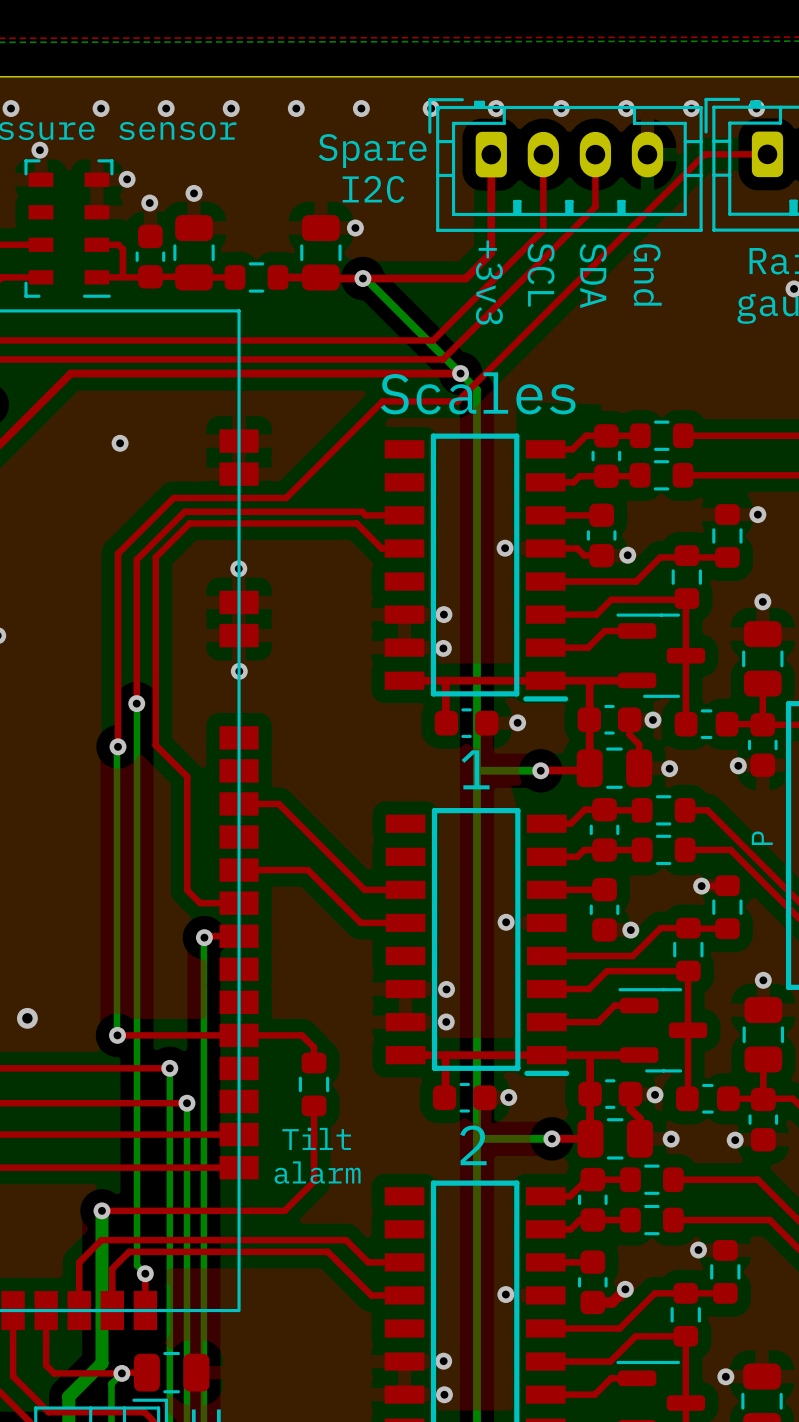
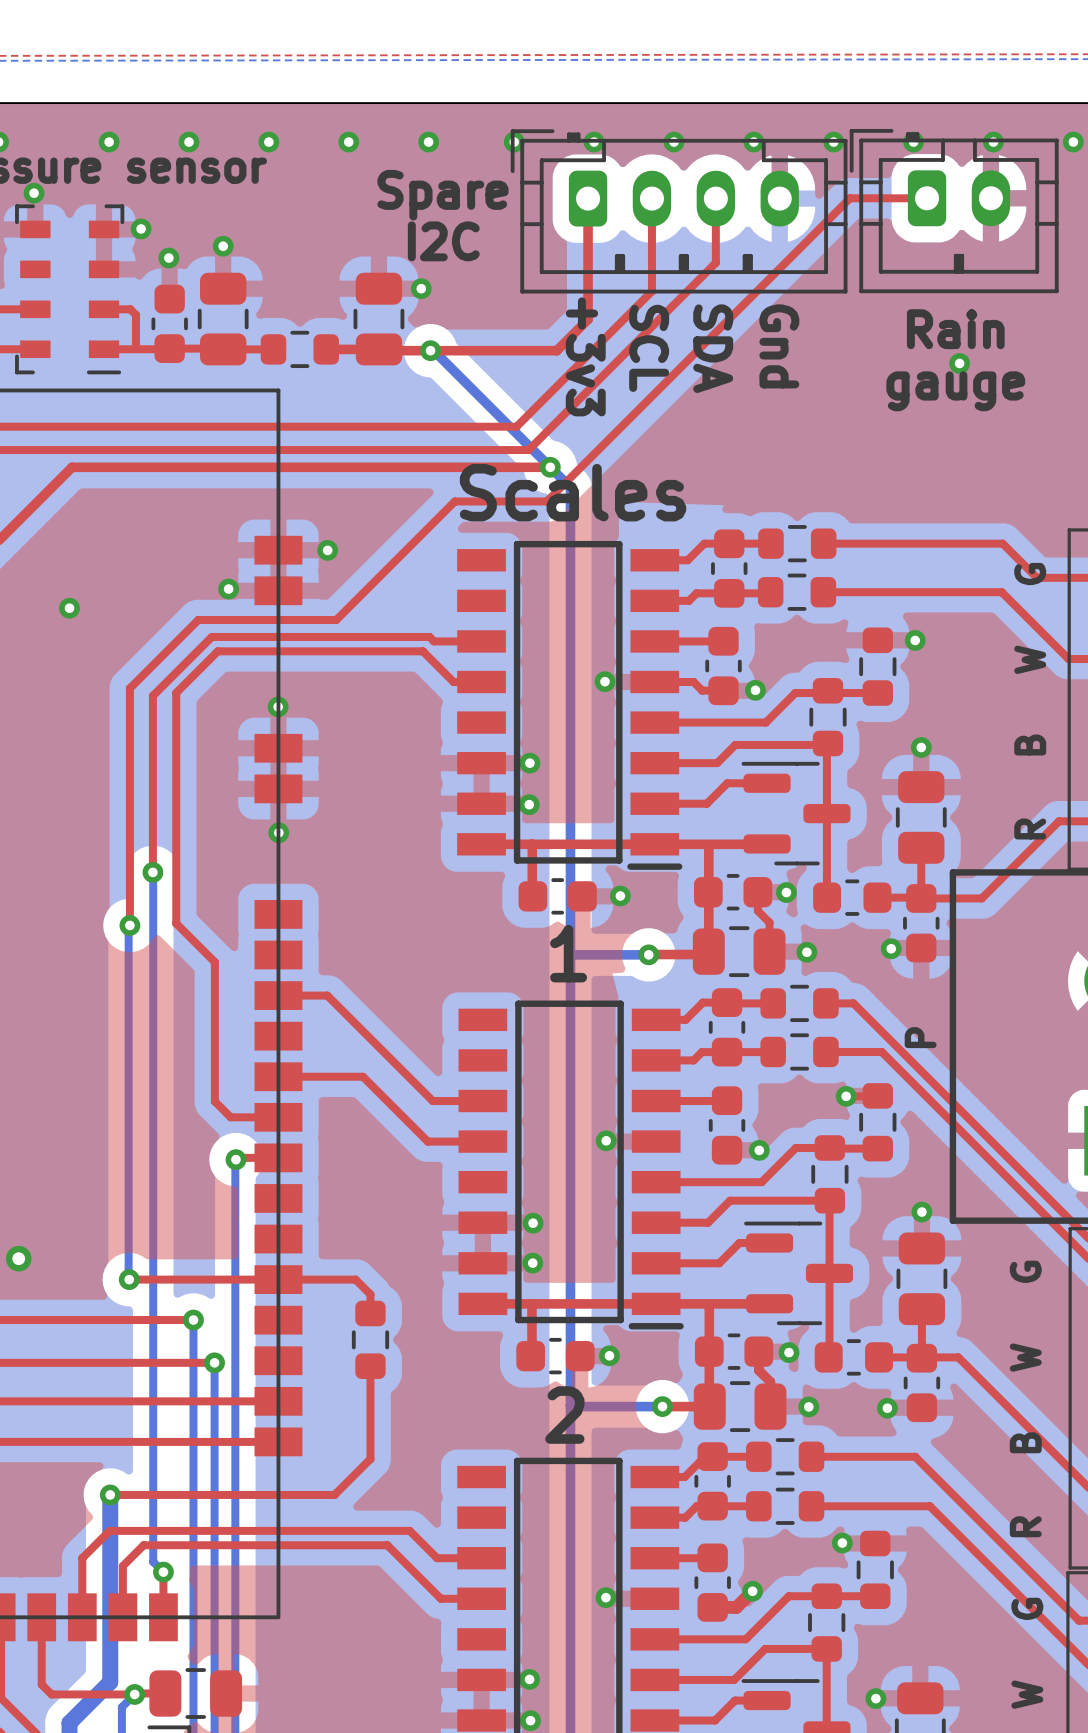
via: none -> (327, 550)
via: (120, 443) -> none
via: none -> (228, 589)
via: none -> (69, 608)
text: Tilt (316, 1138) -> none
text: alarm (317, 1172) -> none

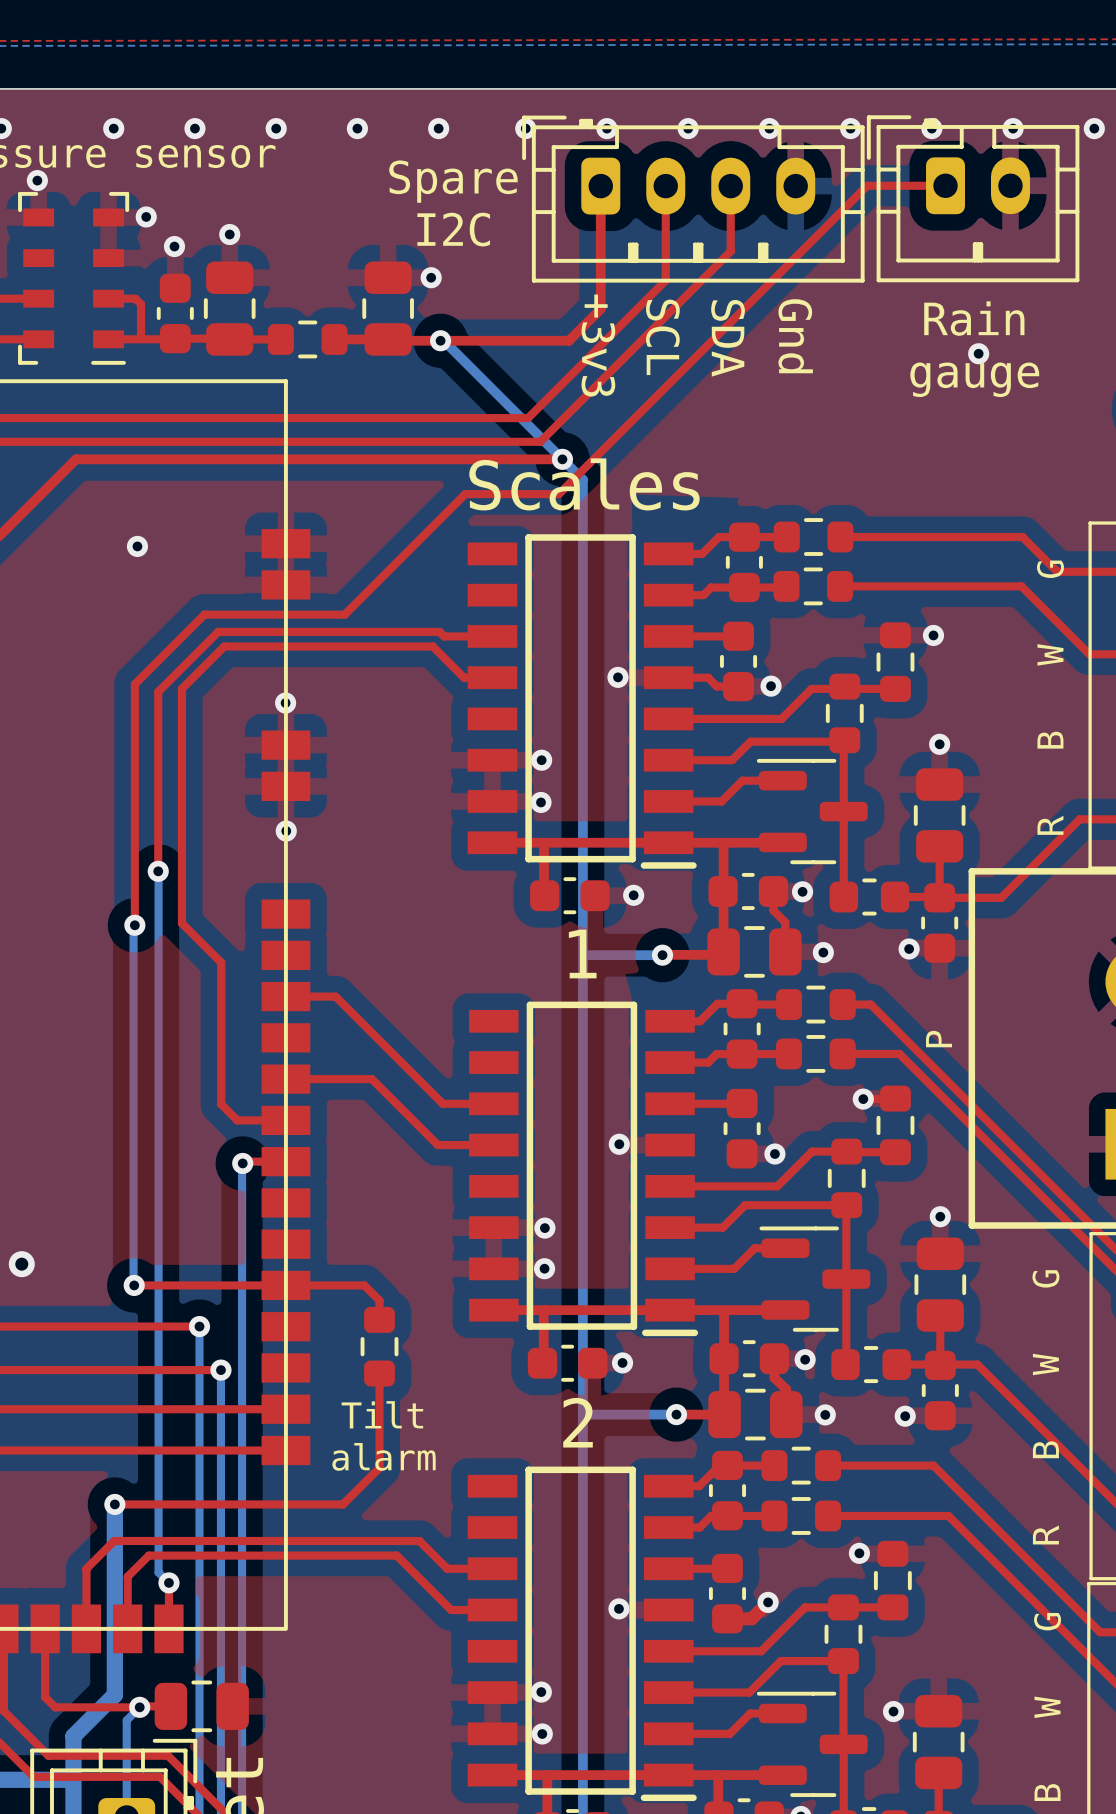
via: (327, 550) -> none
via: none -> (137, 546)
via: (228, 589) -> none
via: (69, 608) -> none
text: none -> Tilt (382, 1414)
text: none -> alarm (384, 1456)

